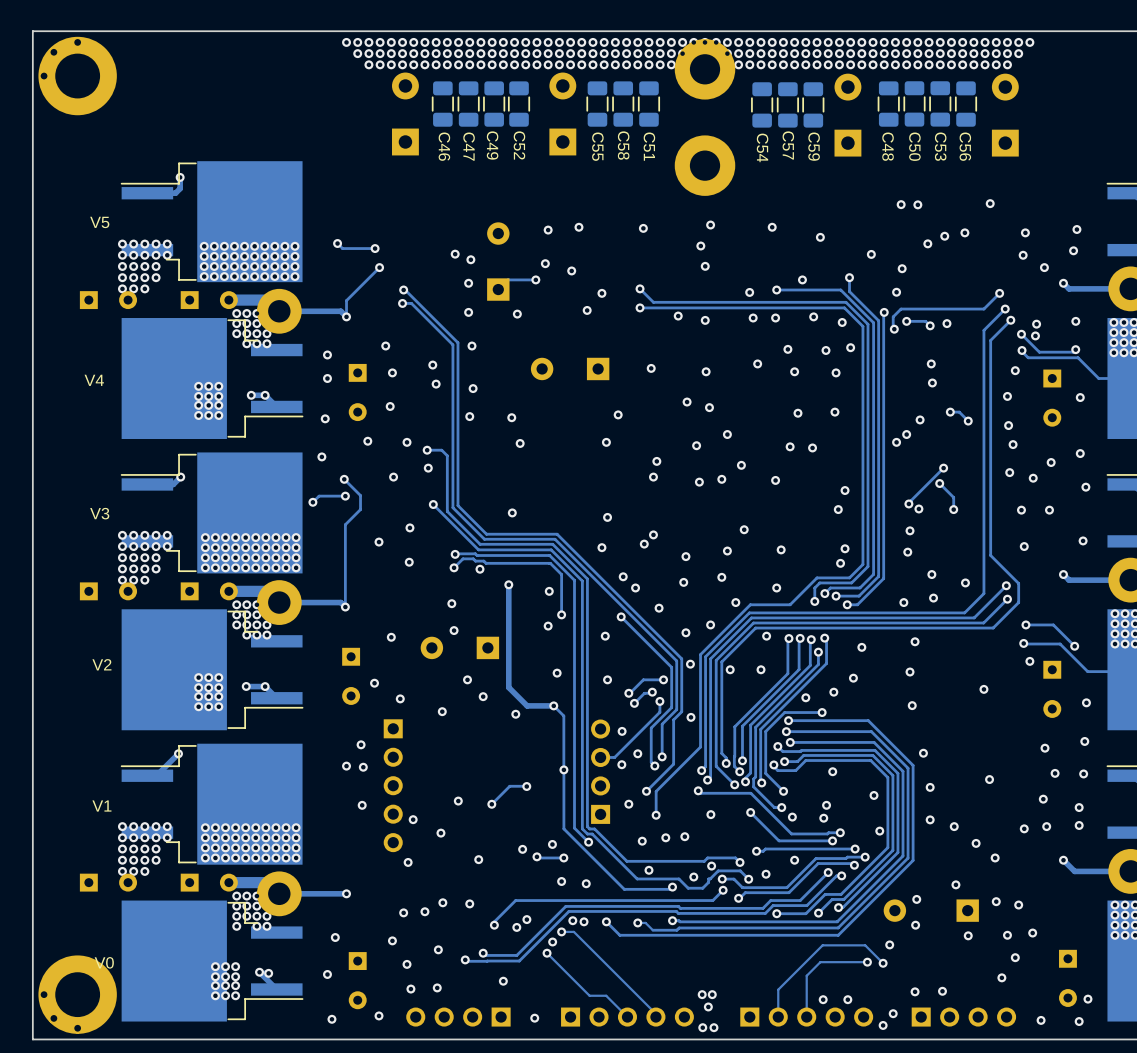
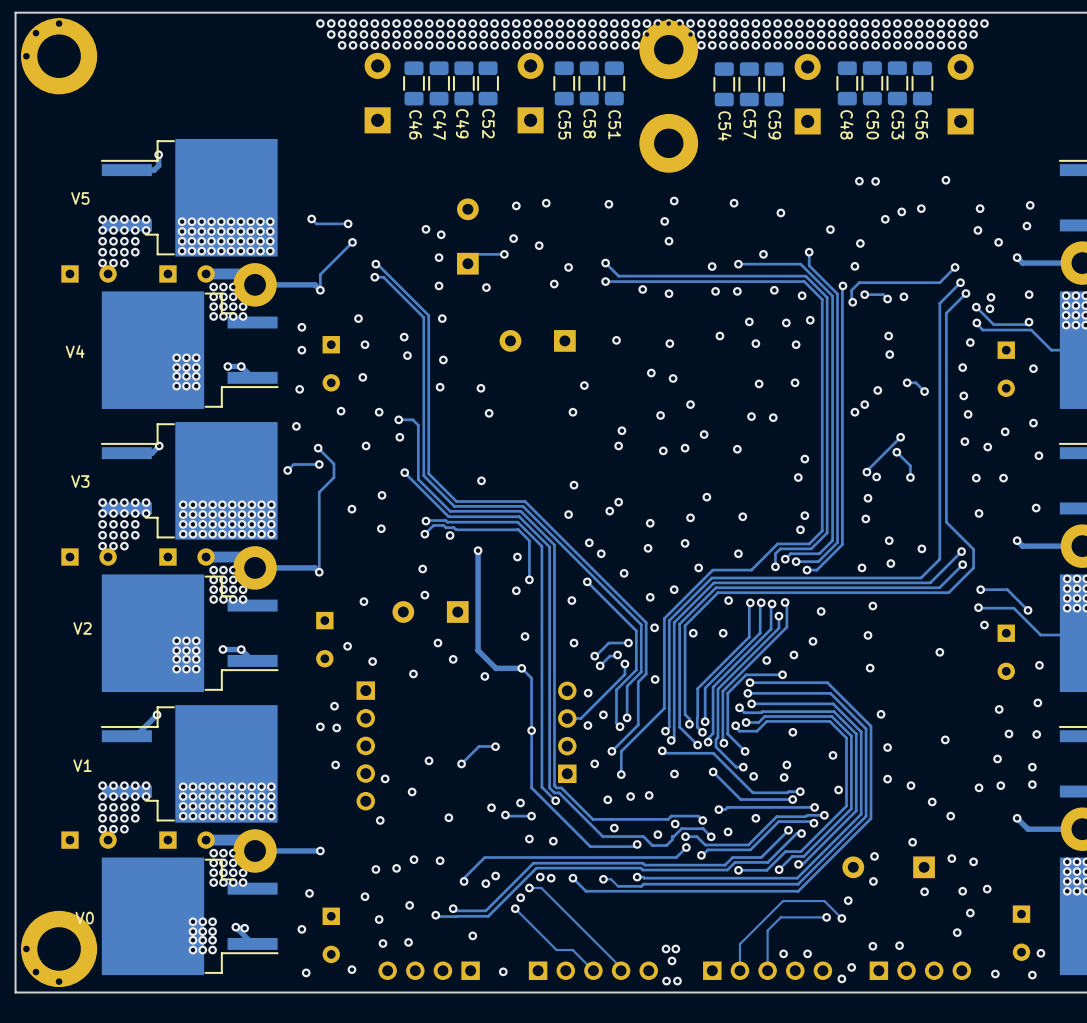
via: none -> (213, 316)
via: none -> (213, 599)
via: none -> (223, 882)

